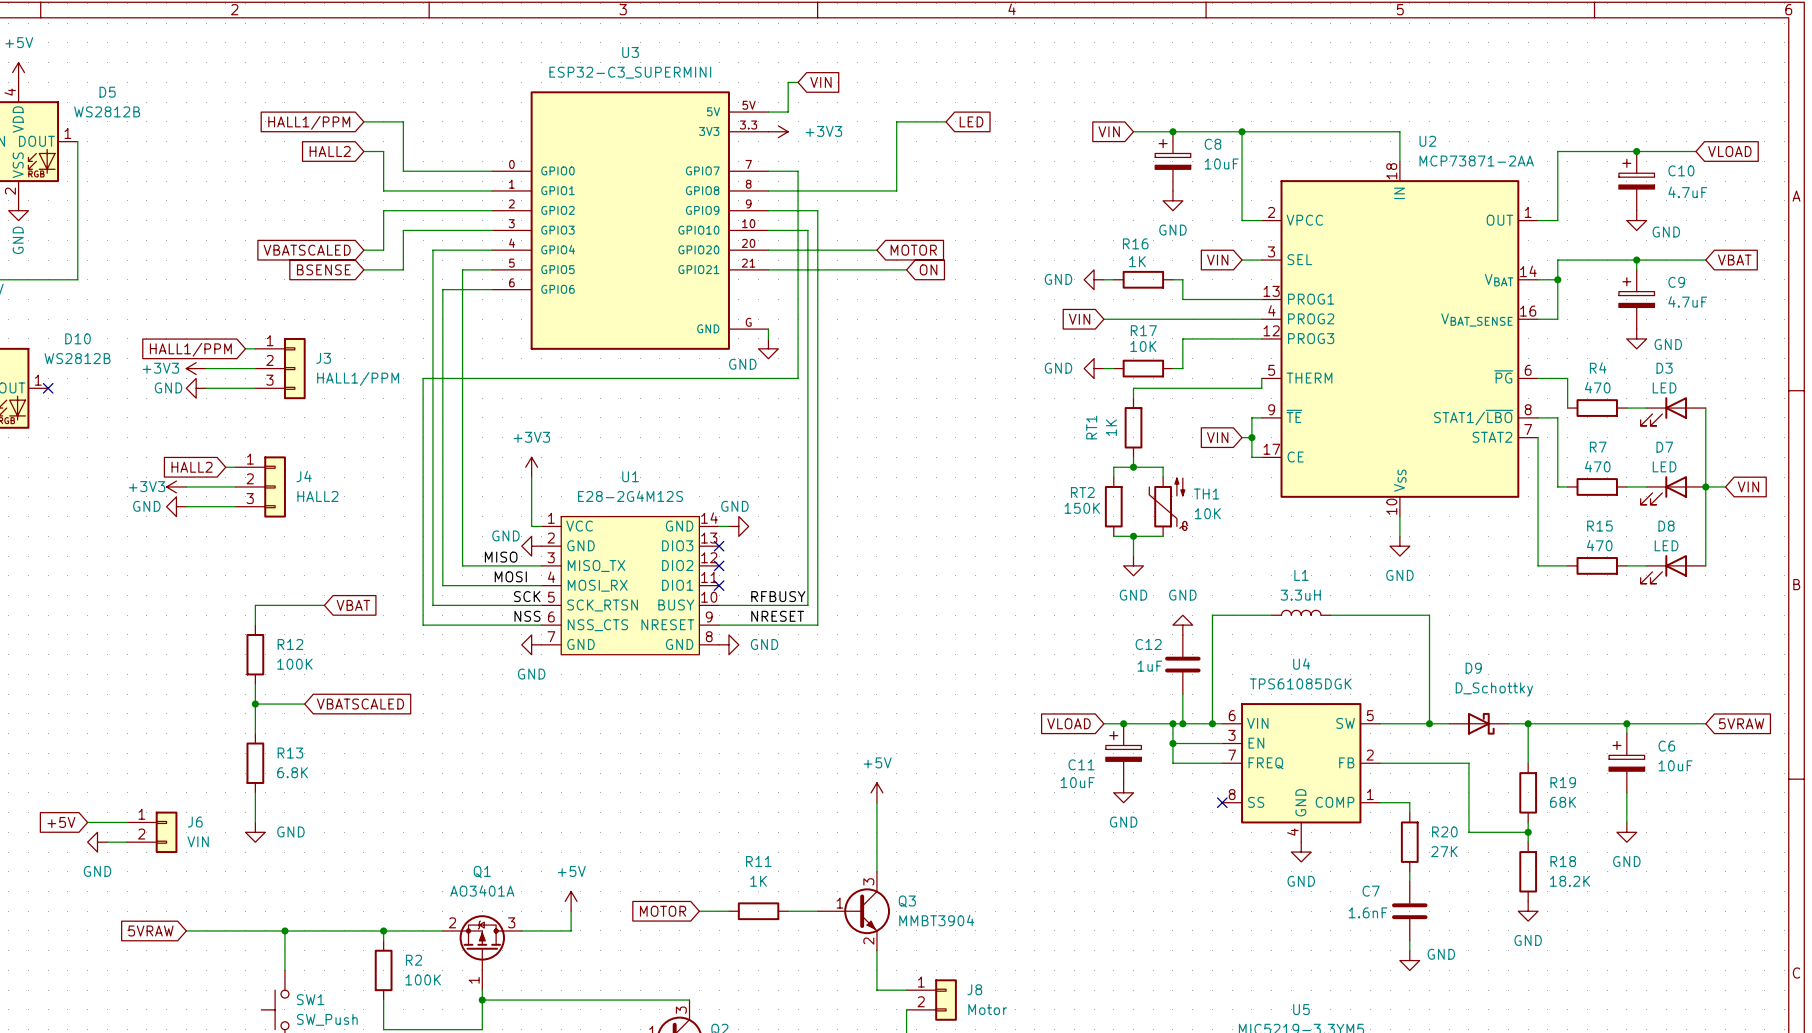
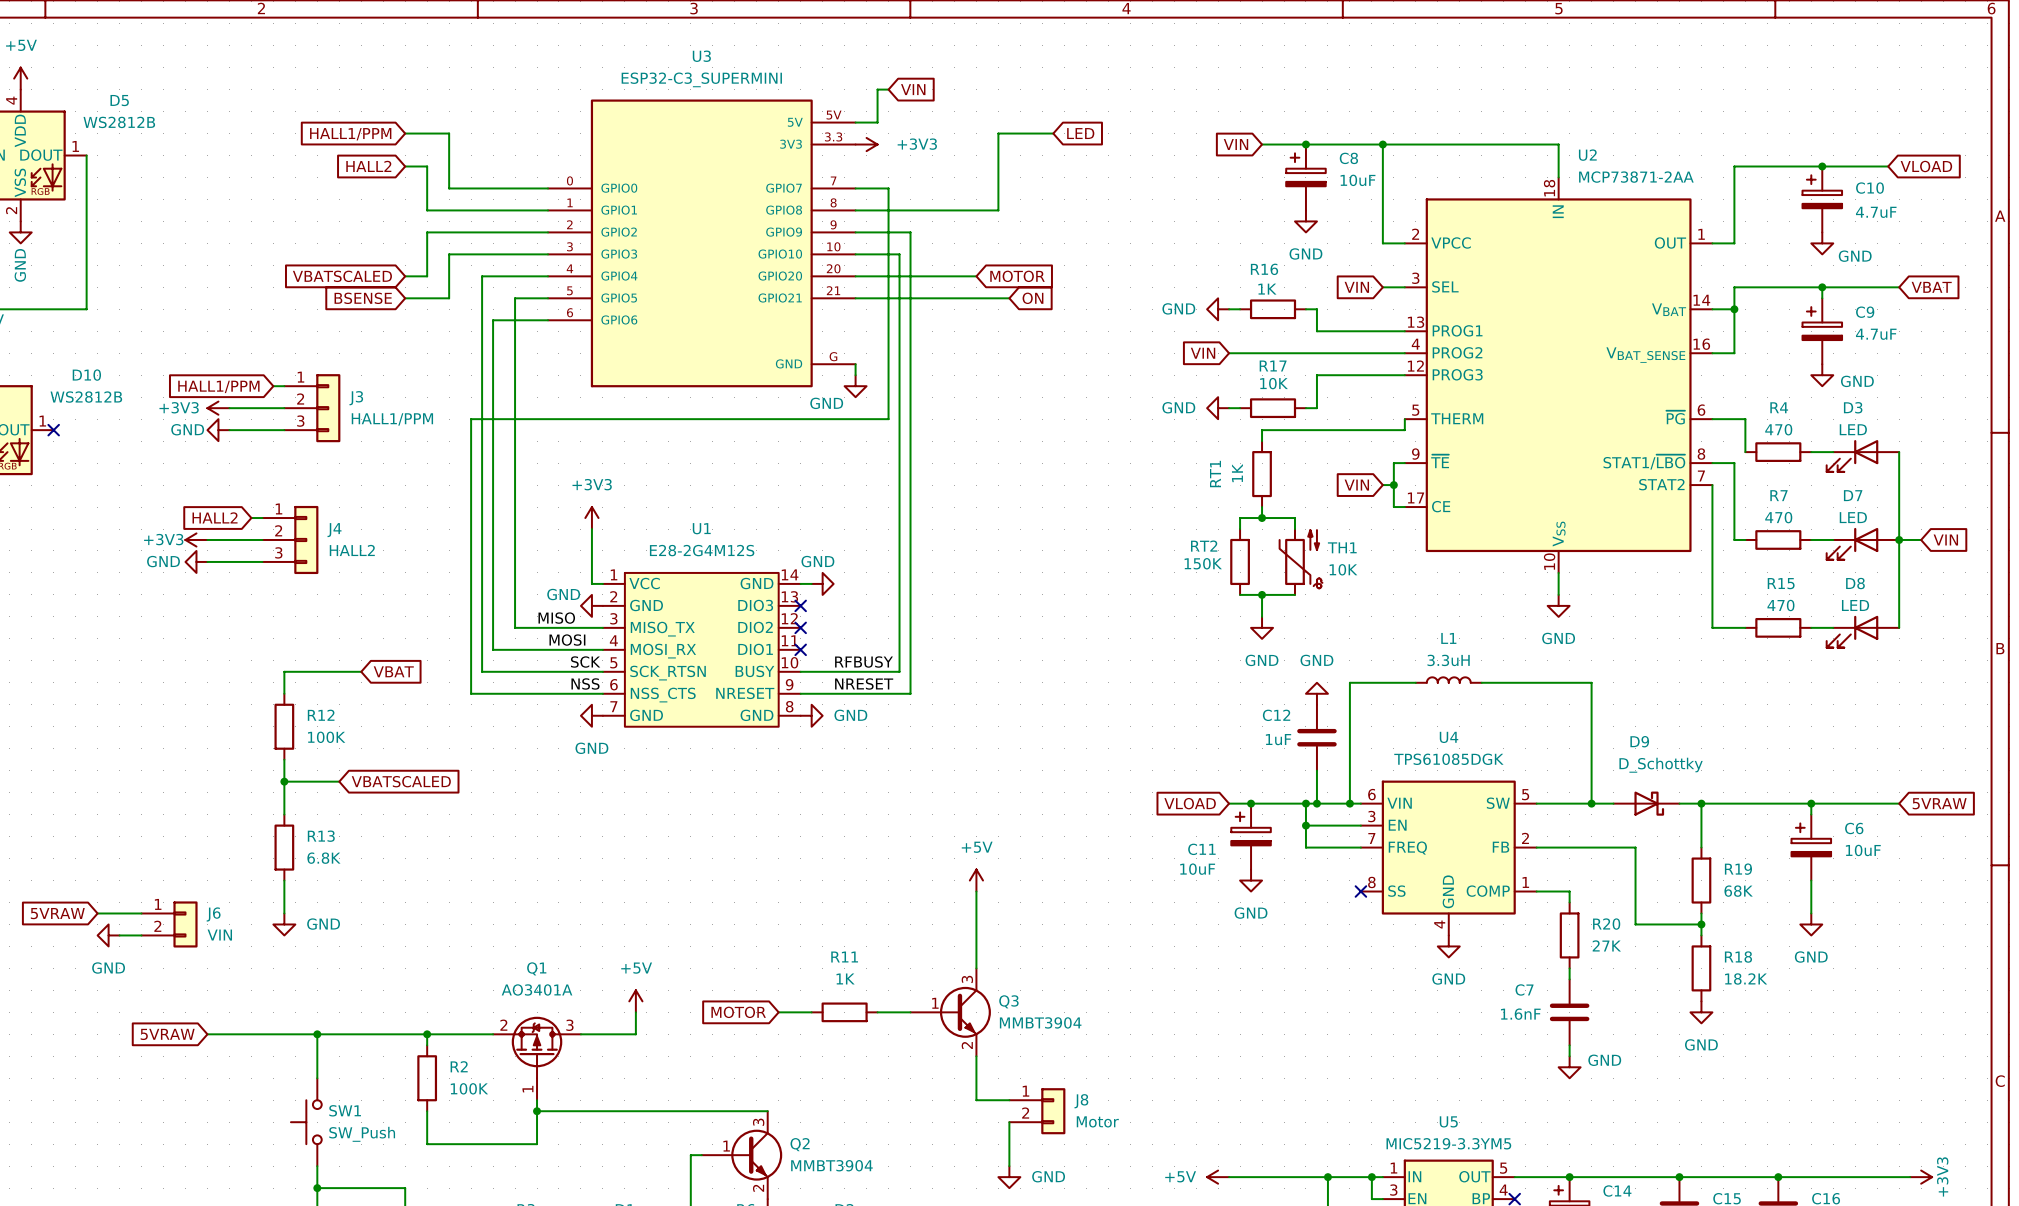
global label: +5V (61, 822) -> 5VRAW (57, 913)

